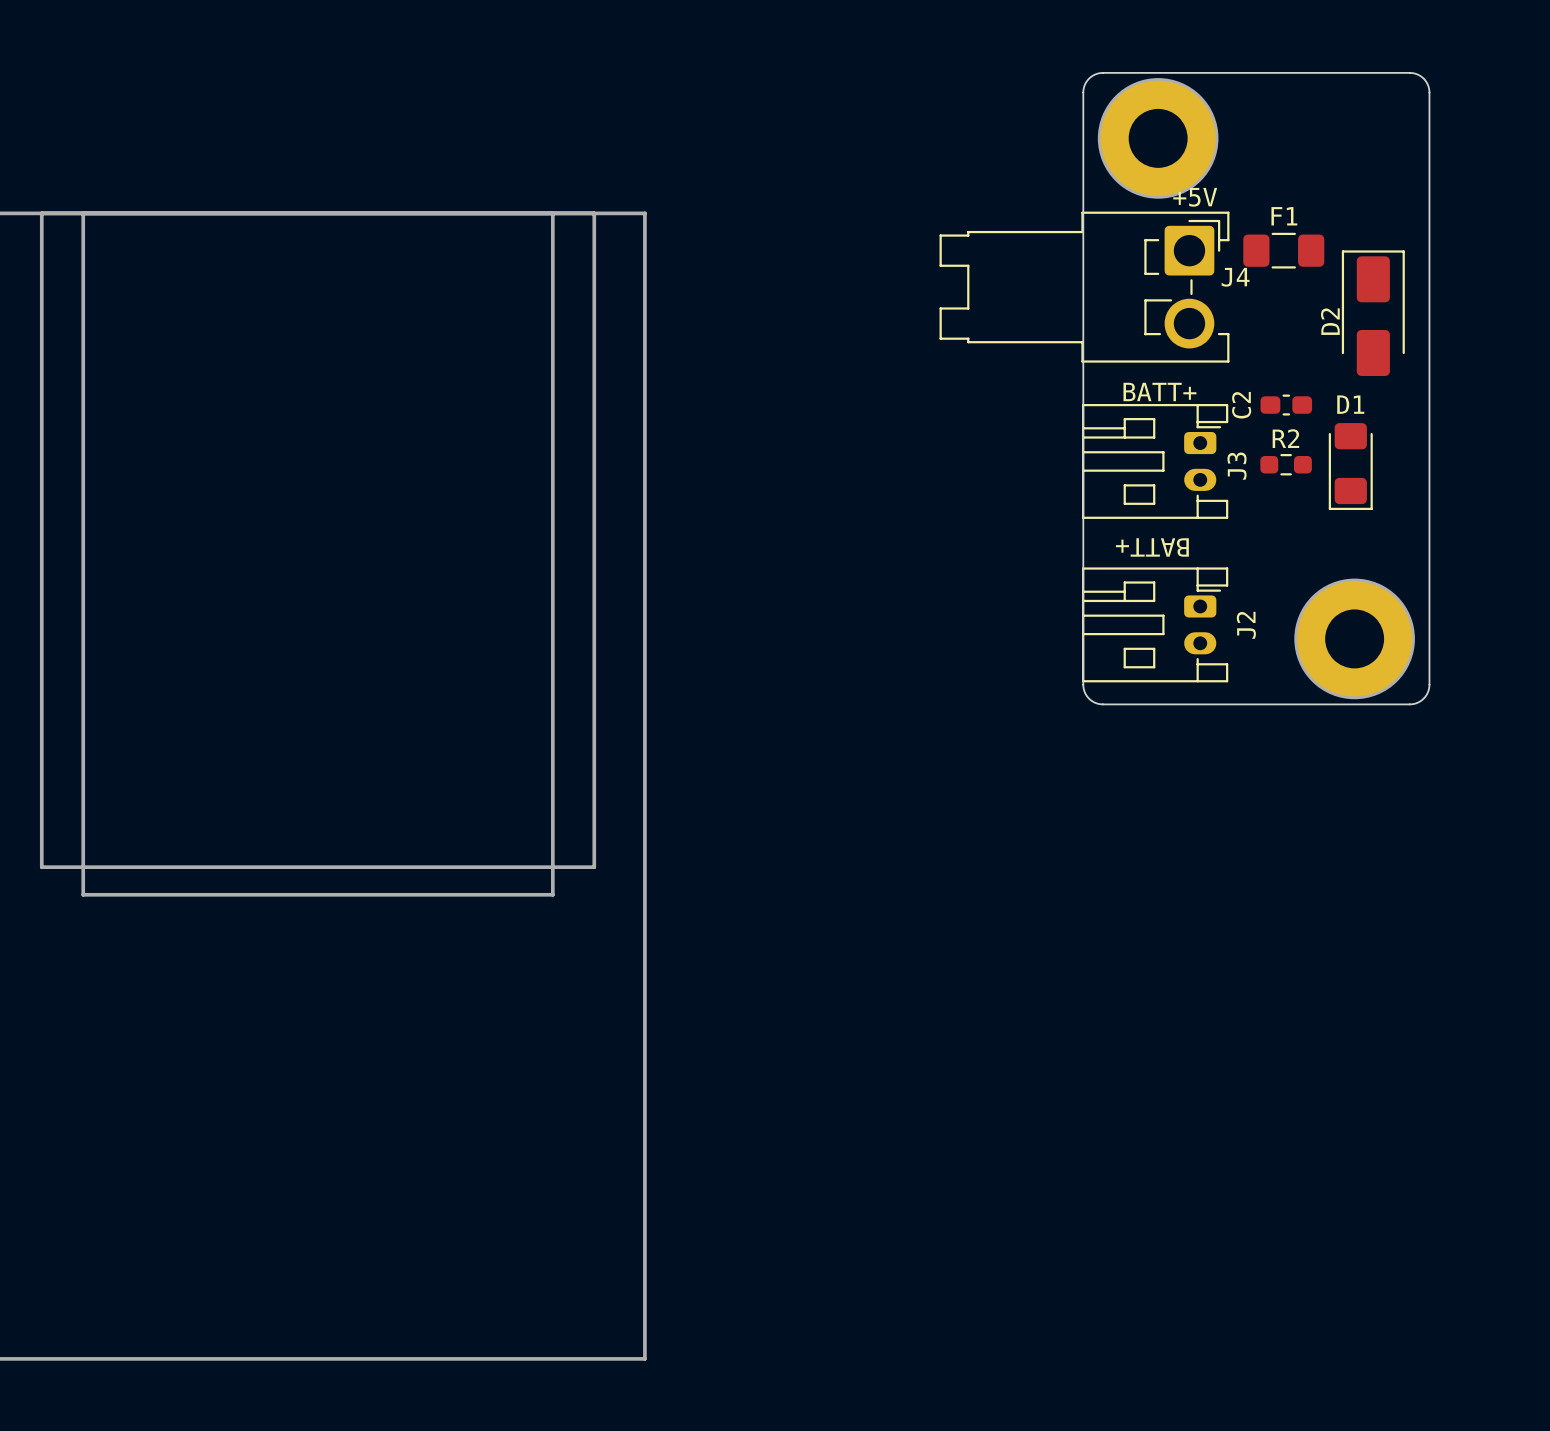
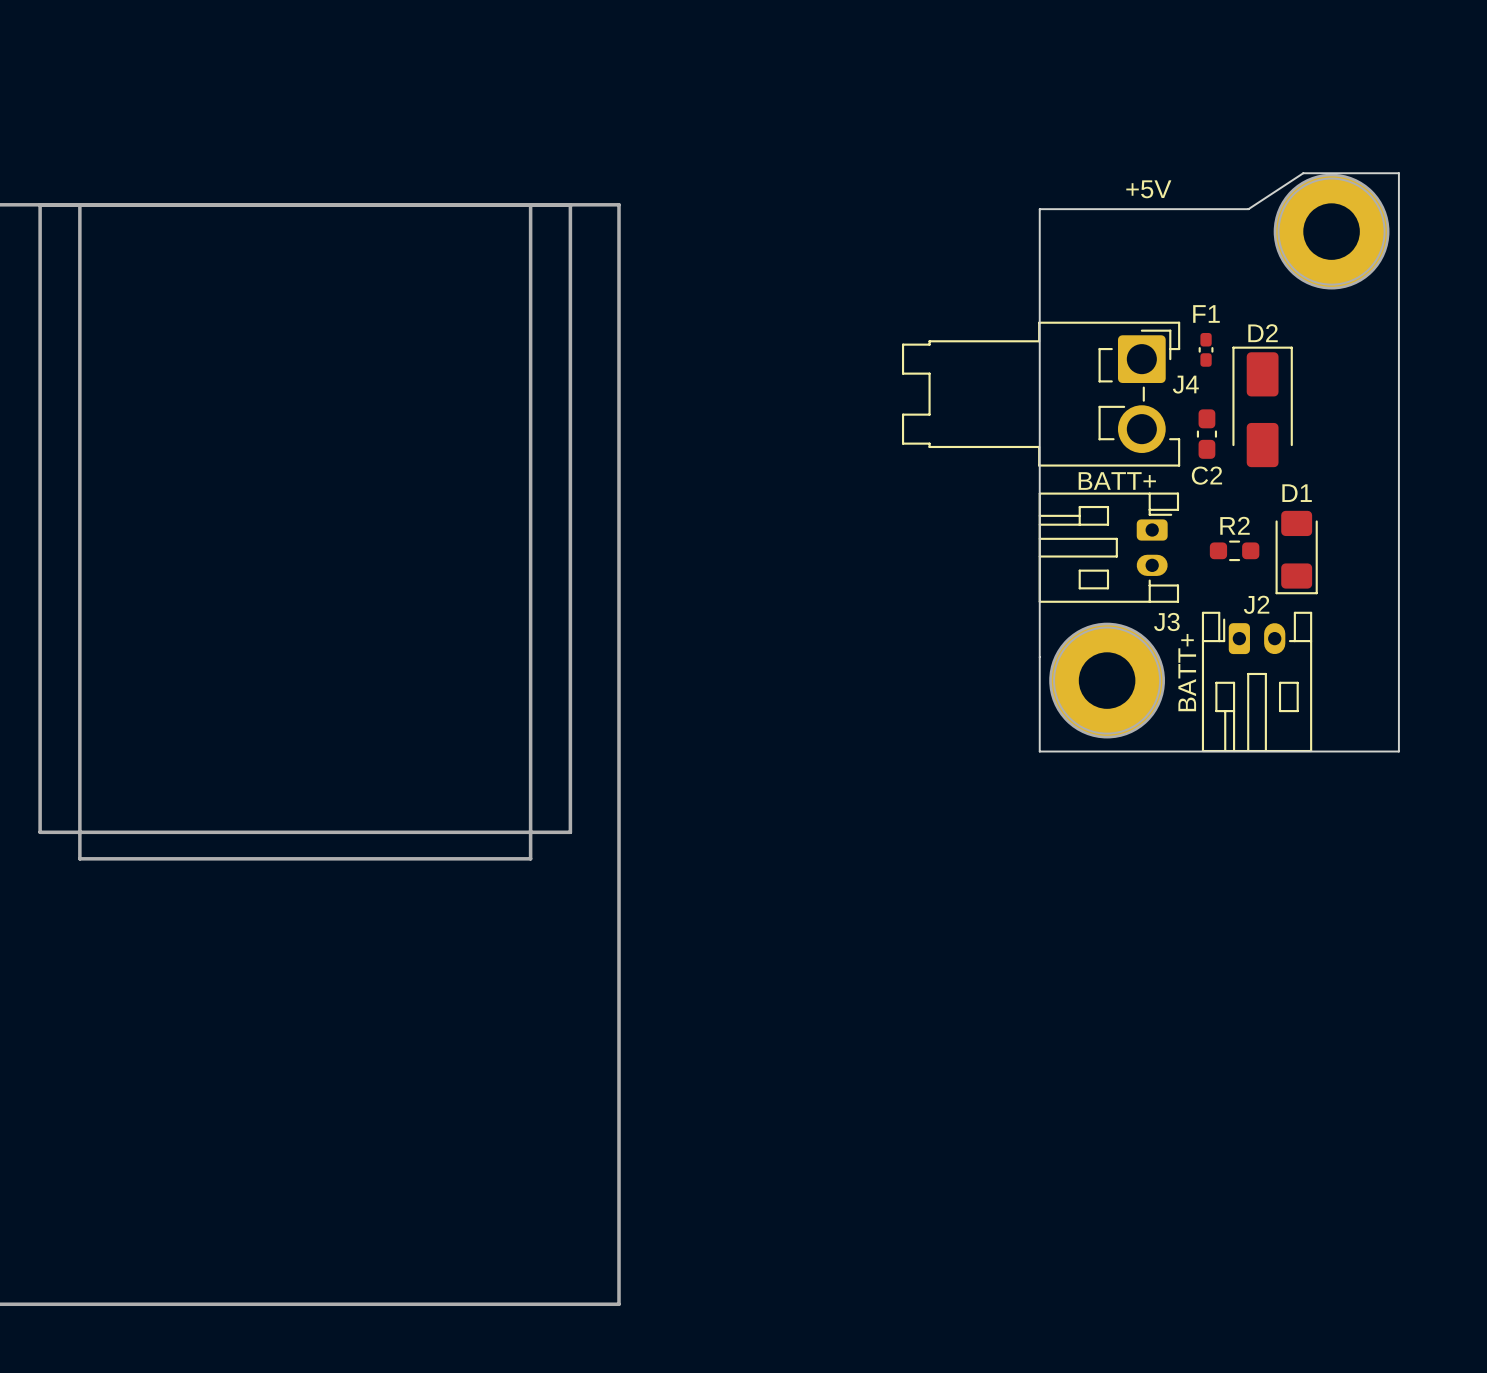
part: (1158, 138) -> none
drawing: none -> [1277, 177, 1386, 286]
board edge: (1083, 217) (1083, 90) (1087, 80) (1096, 74) (1409, 72) (1422, 77) (1428, 86) (1429, 684) (1426, 695) (1420, 701) (1409, 704) (1102, 704) (1089, 698) (1083, 684) -> (1039, 209) (1248, 209) (1303, 173) (1398, 173) (1398, 751) (1039, 751) (1039, 657)
F1 footprint: [1243, 232, 1325, 269] -> [1198, 332, 1214, 367]
part: none -> (1331, 231)
J4 position: (1084, 287) -> (1041, 394)
D2 position: (1373, 313) -> (1262, 406)
D2 name rotation: 0° (1330, 321) -> 90° clockwise (1263, 333)
text: BATT+ (1159, 391) -> none
C2 name position: C2 (1241, 405) -> C2 (1206, 475)
C2 rotation: 0° (1286, 405) -> 90° clockwise (1206, 434)
C2 position: (1286, 405) -> (1206, 434)
J3 position: (1155, 461) -> (1108, 547)
R2 position: (1286, 464) -> (1234, 550)
J3 name rotation: 0° (1237, 466) -> 90° clockwise (1166, 621)
J3 name position: J3 (1237, 466) -> J3 (1166, 621)
D1 position: (1350, 466) -> (1296, 552)
text: none -> BATT+ (1117, 481)
text: BATT+ (1152, 547) -> none
J2 rotation: 0° (1155, 624) -> 90° counterclockwise (1257, 681)
J2 position: (1155, 624) -> (1257, 681)
part: (1354, 638) -> none
drawing: none -> [1053, 626, 1162, 735]
text: none -> BATT+ (1187, 672)
part: none -> (1107, 680)

